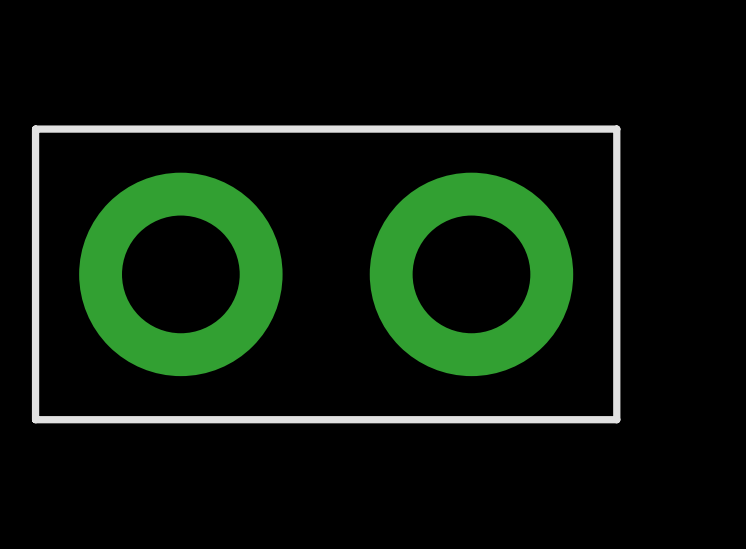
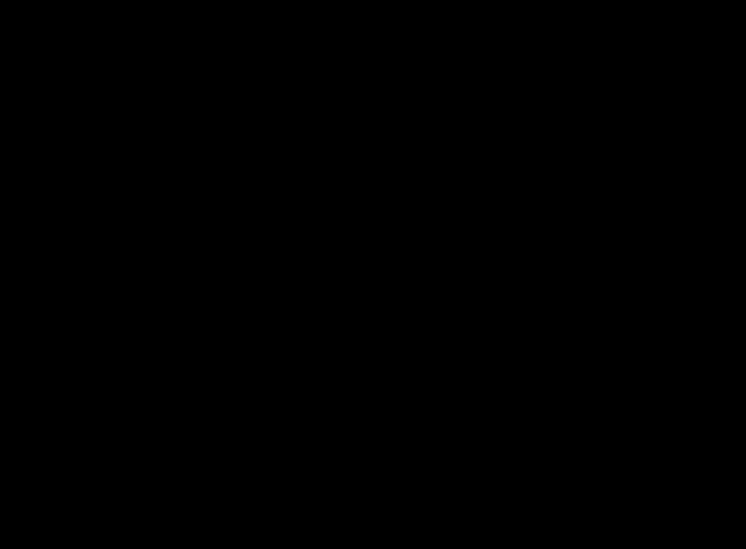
part: (326, 274) -> none

